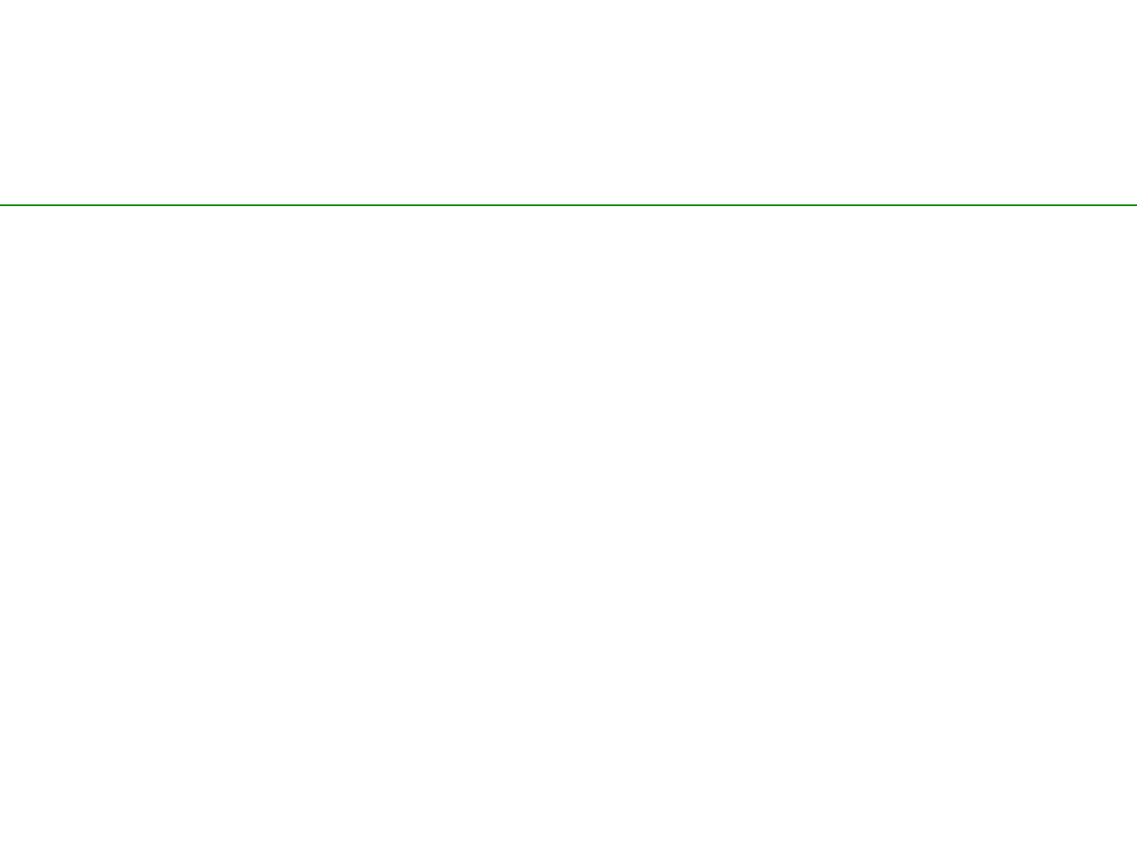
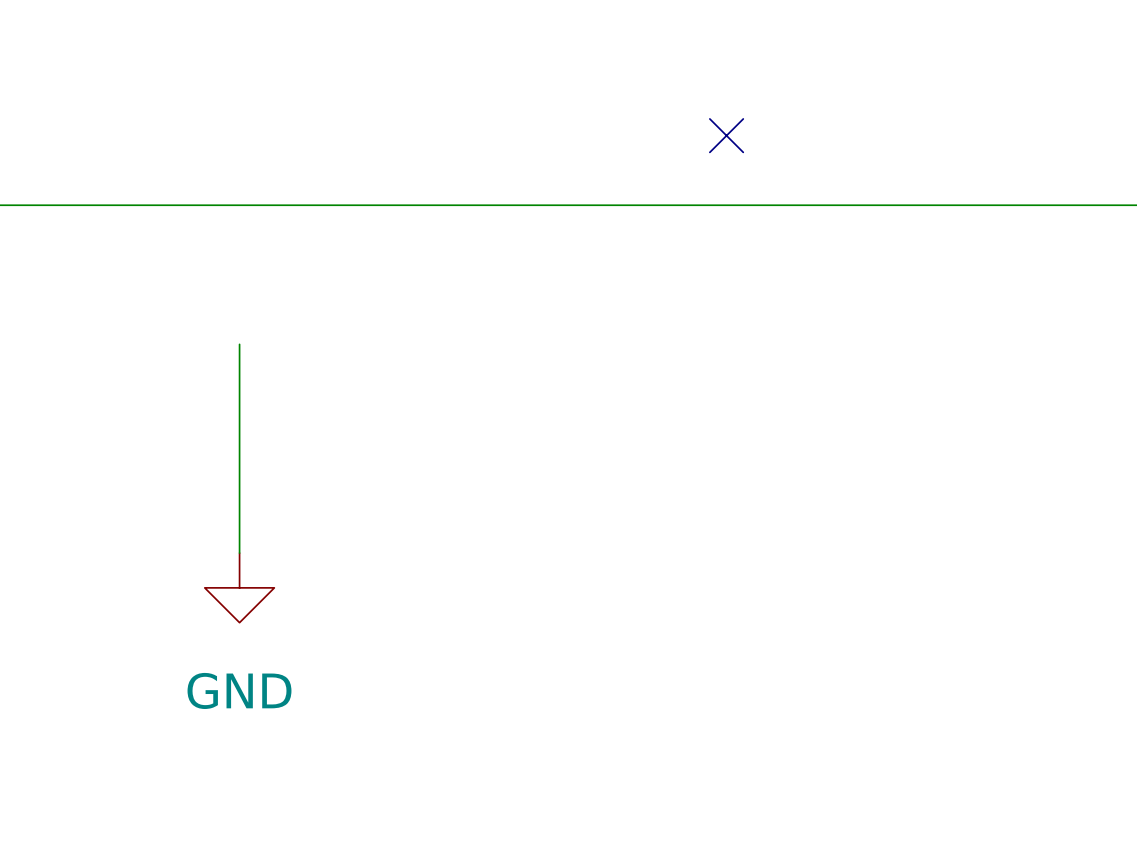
no-connect mark: none -> (726, 135)
wire: none -> (239, 344) (239, 553)
power symbol: none -> GND (239, 587)

